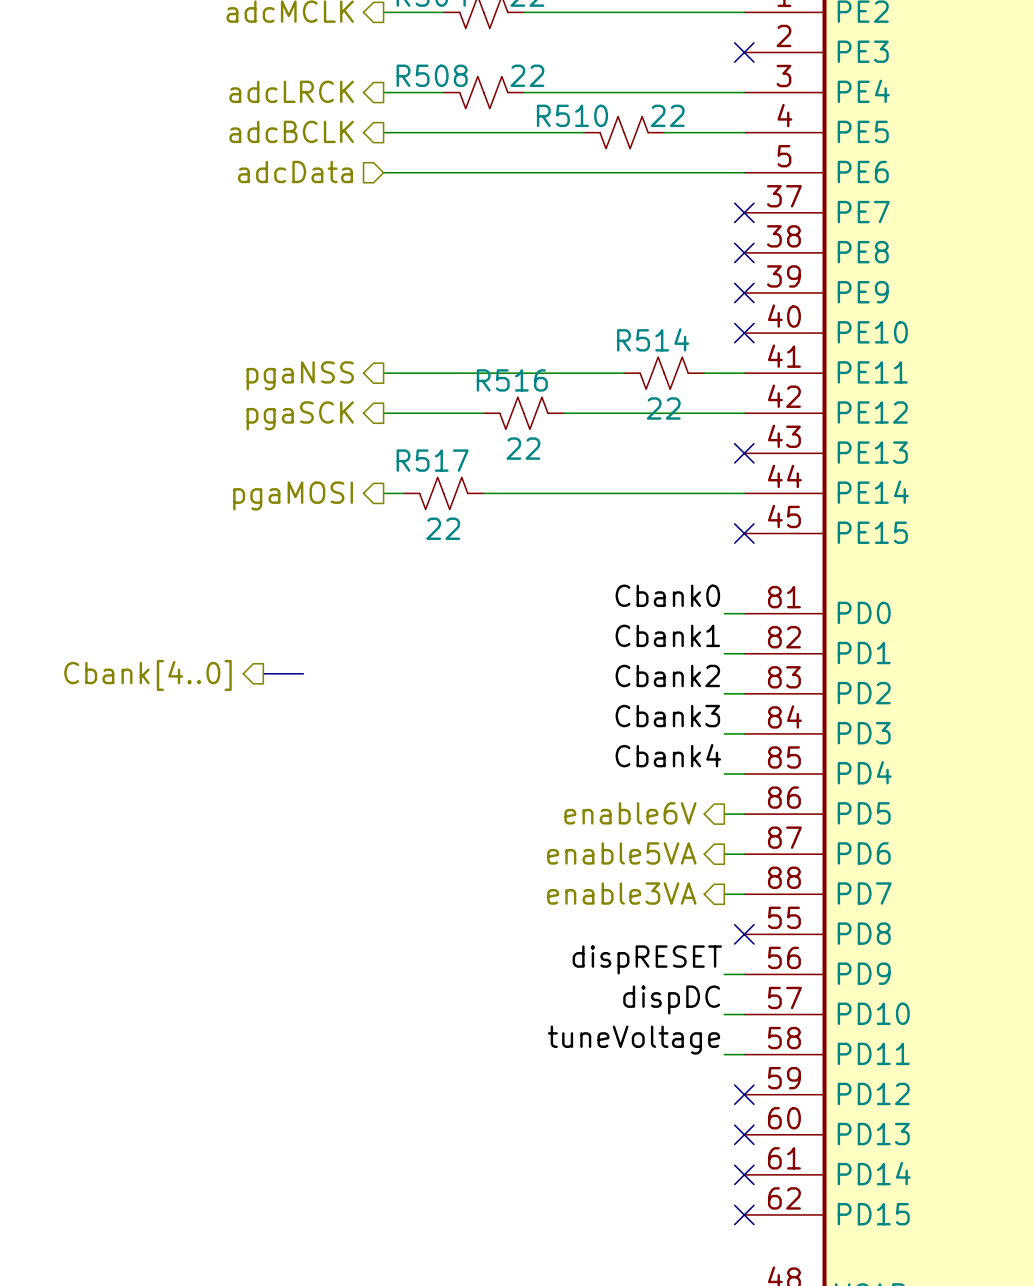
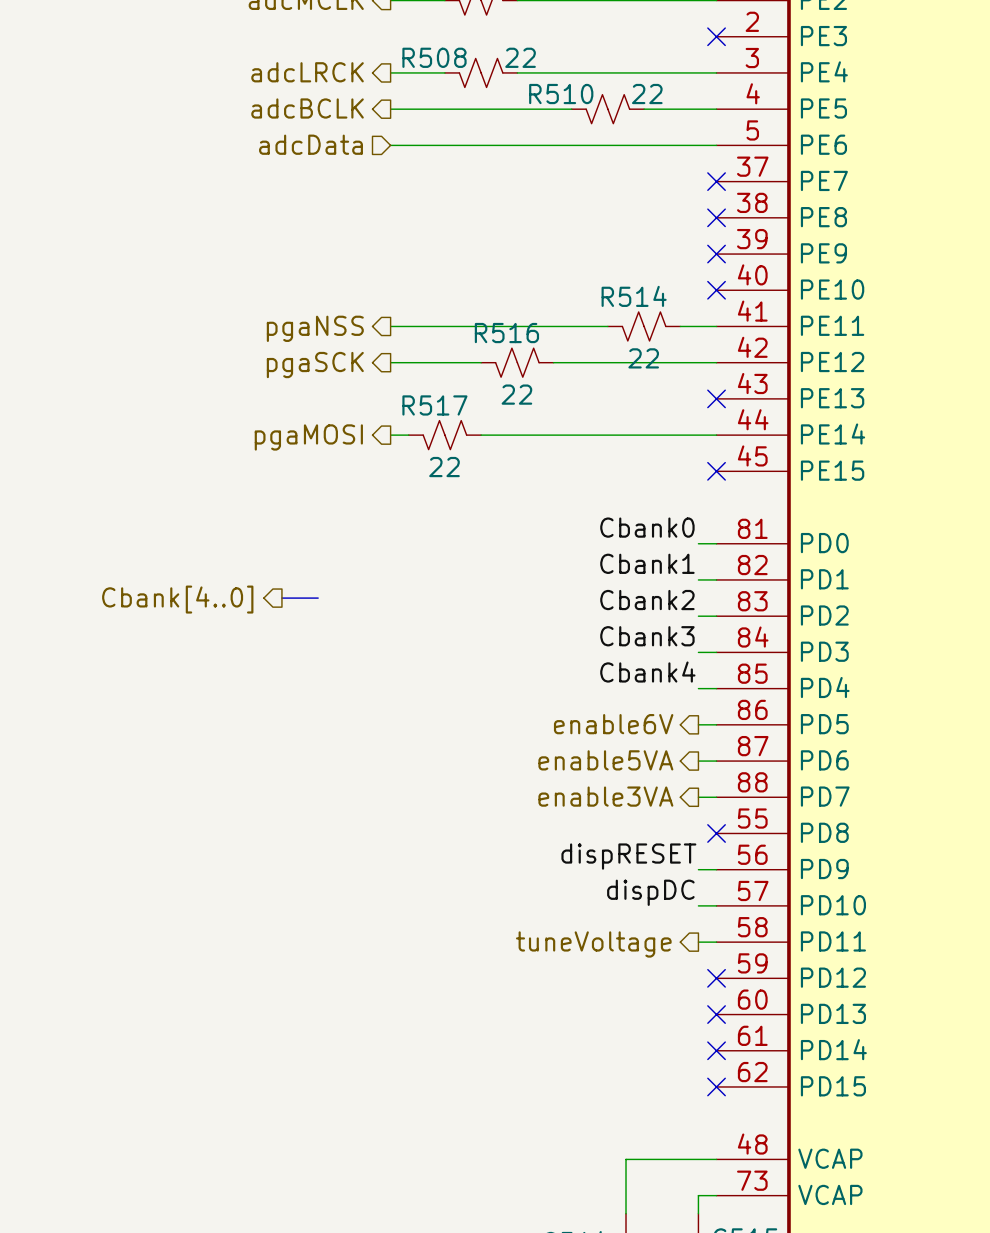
label: tuneVoltage (633, 1040) -> none
hierarchical label: none -> tuneVoltage (593, 944)

